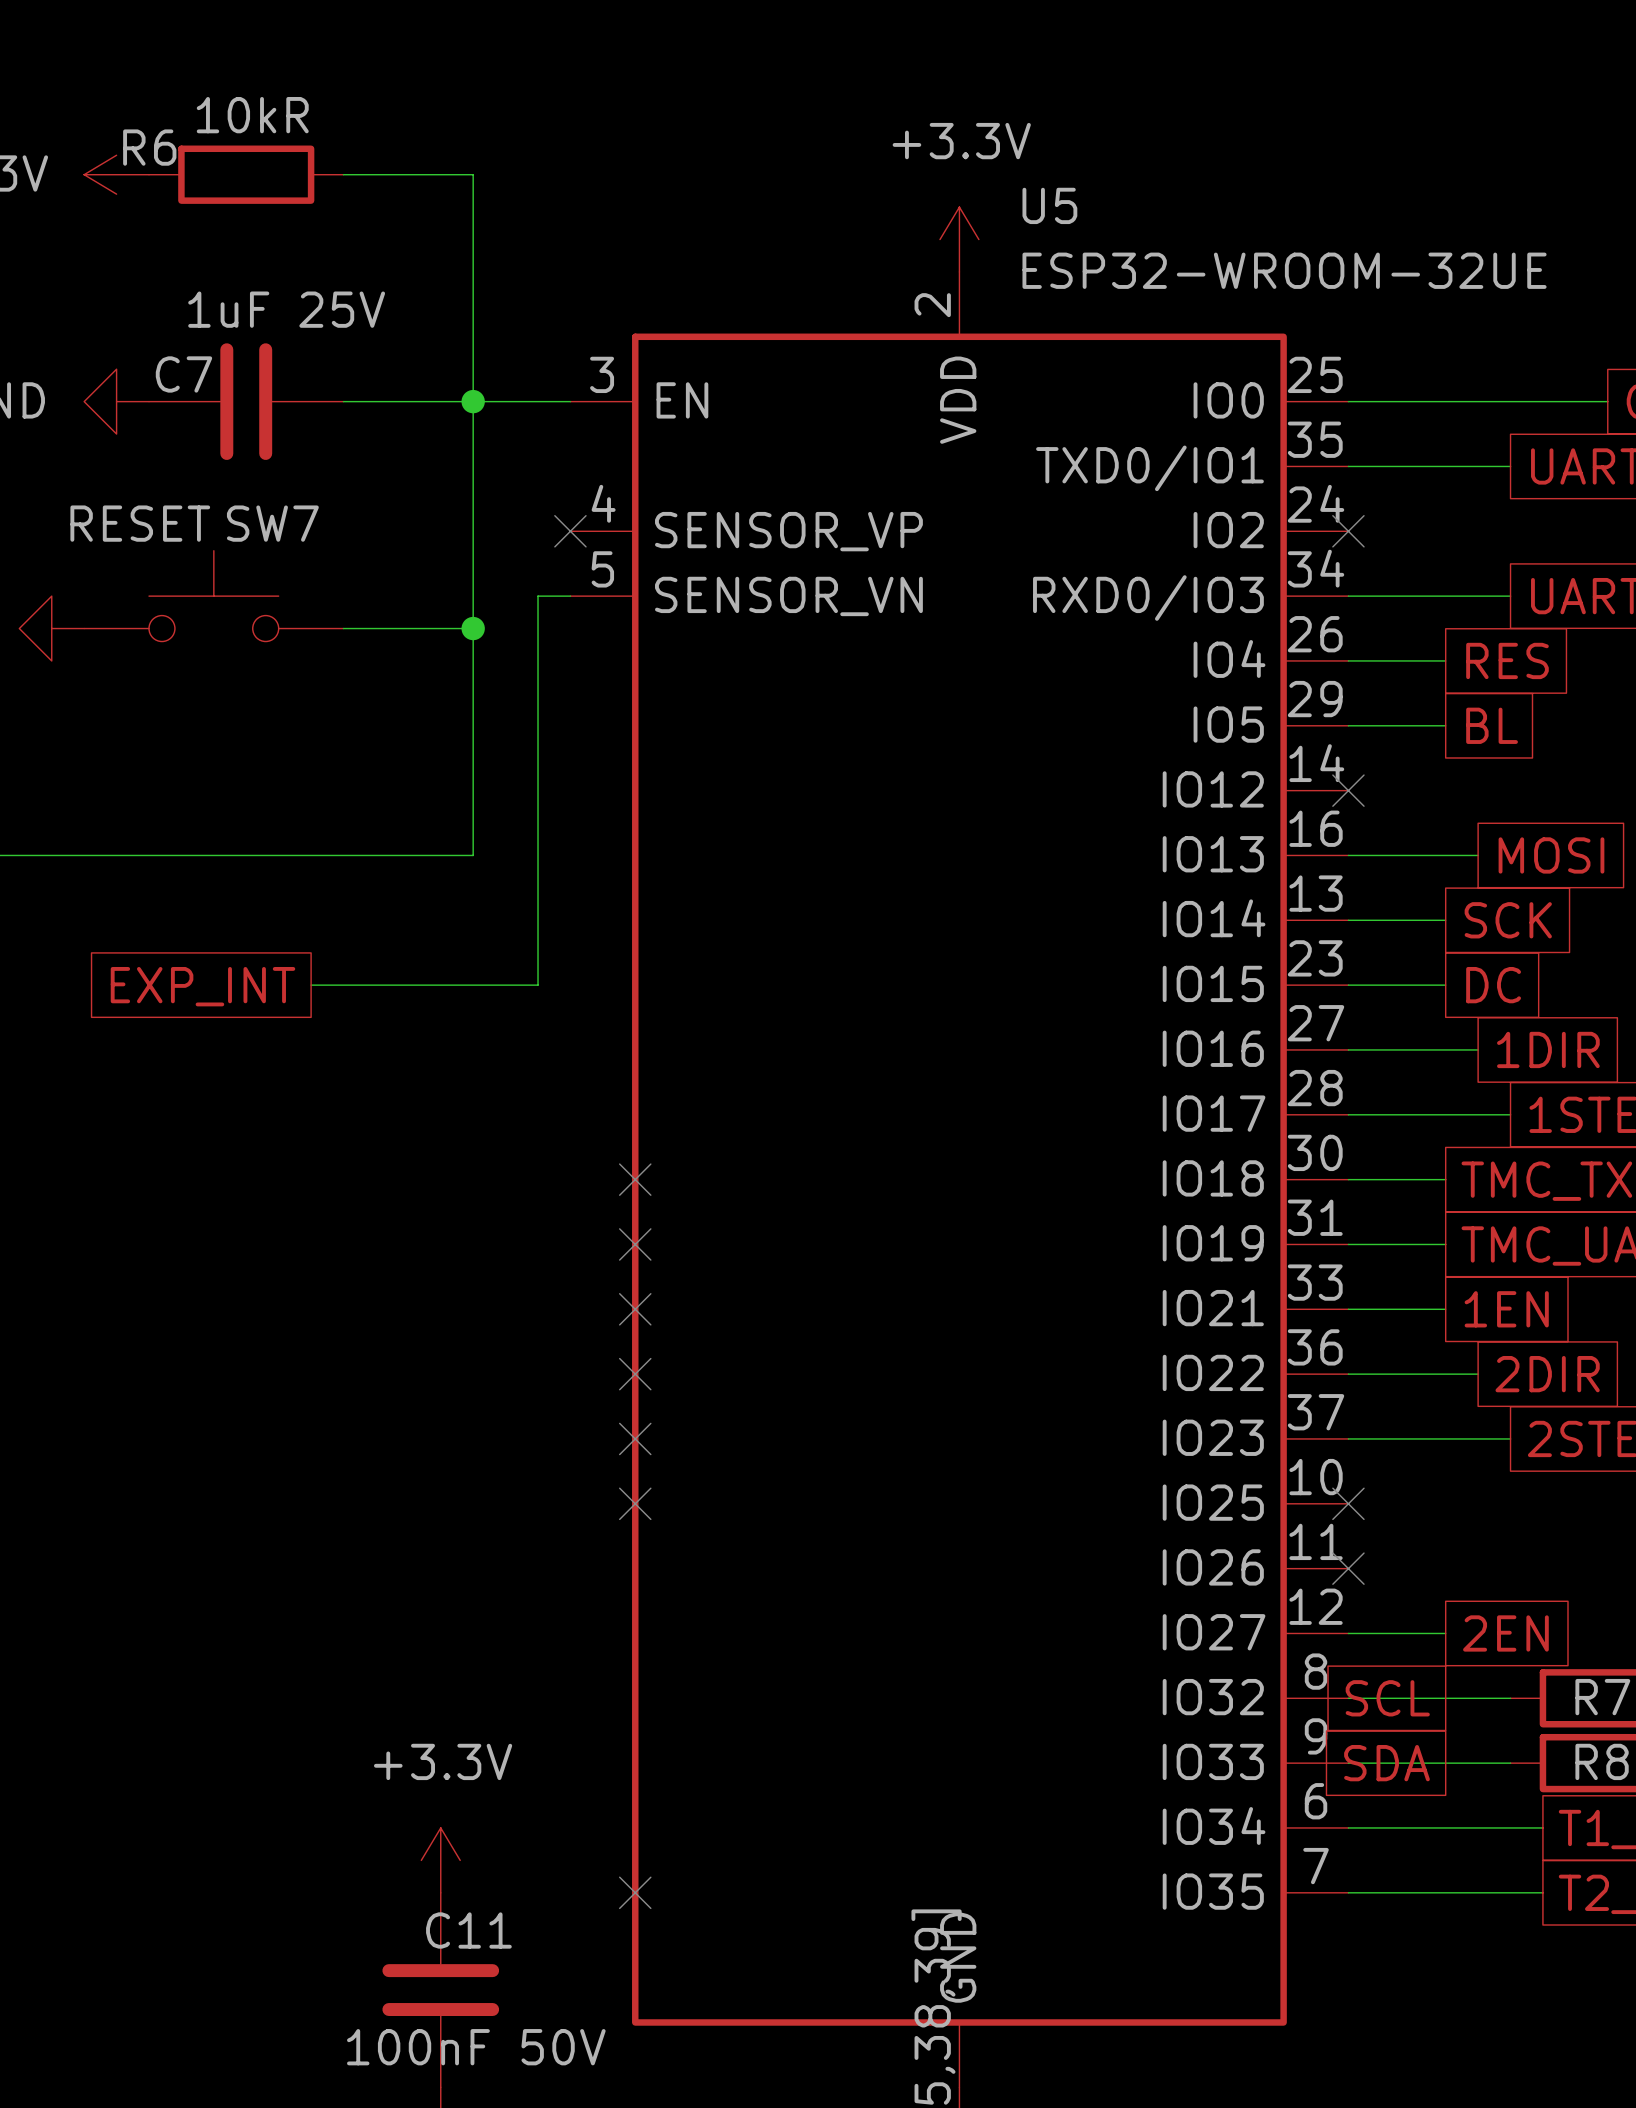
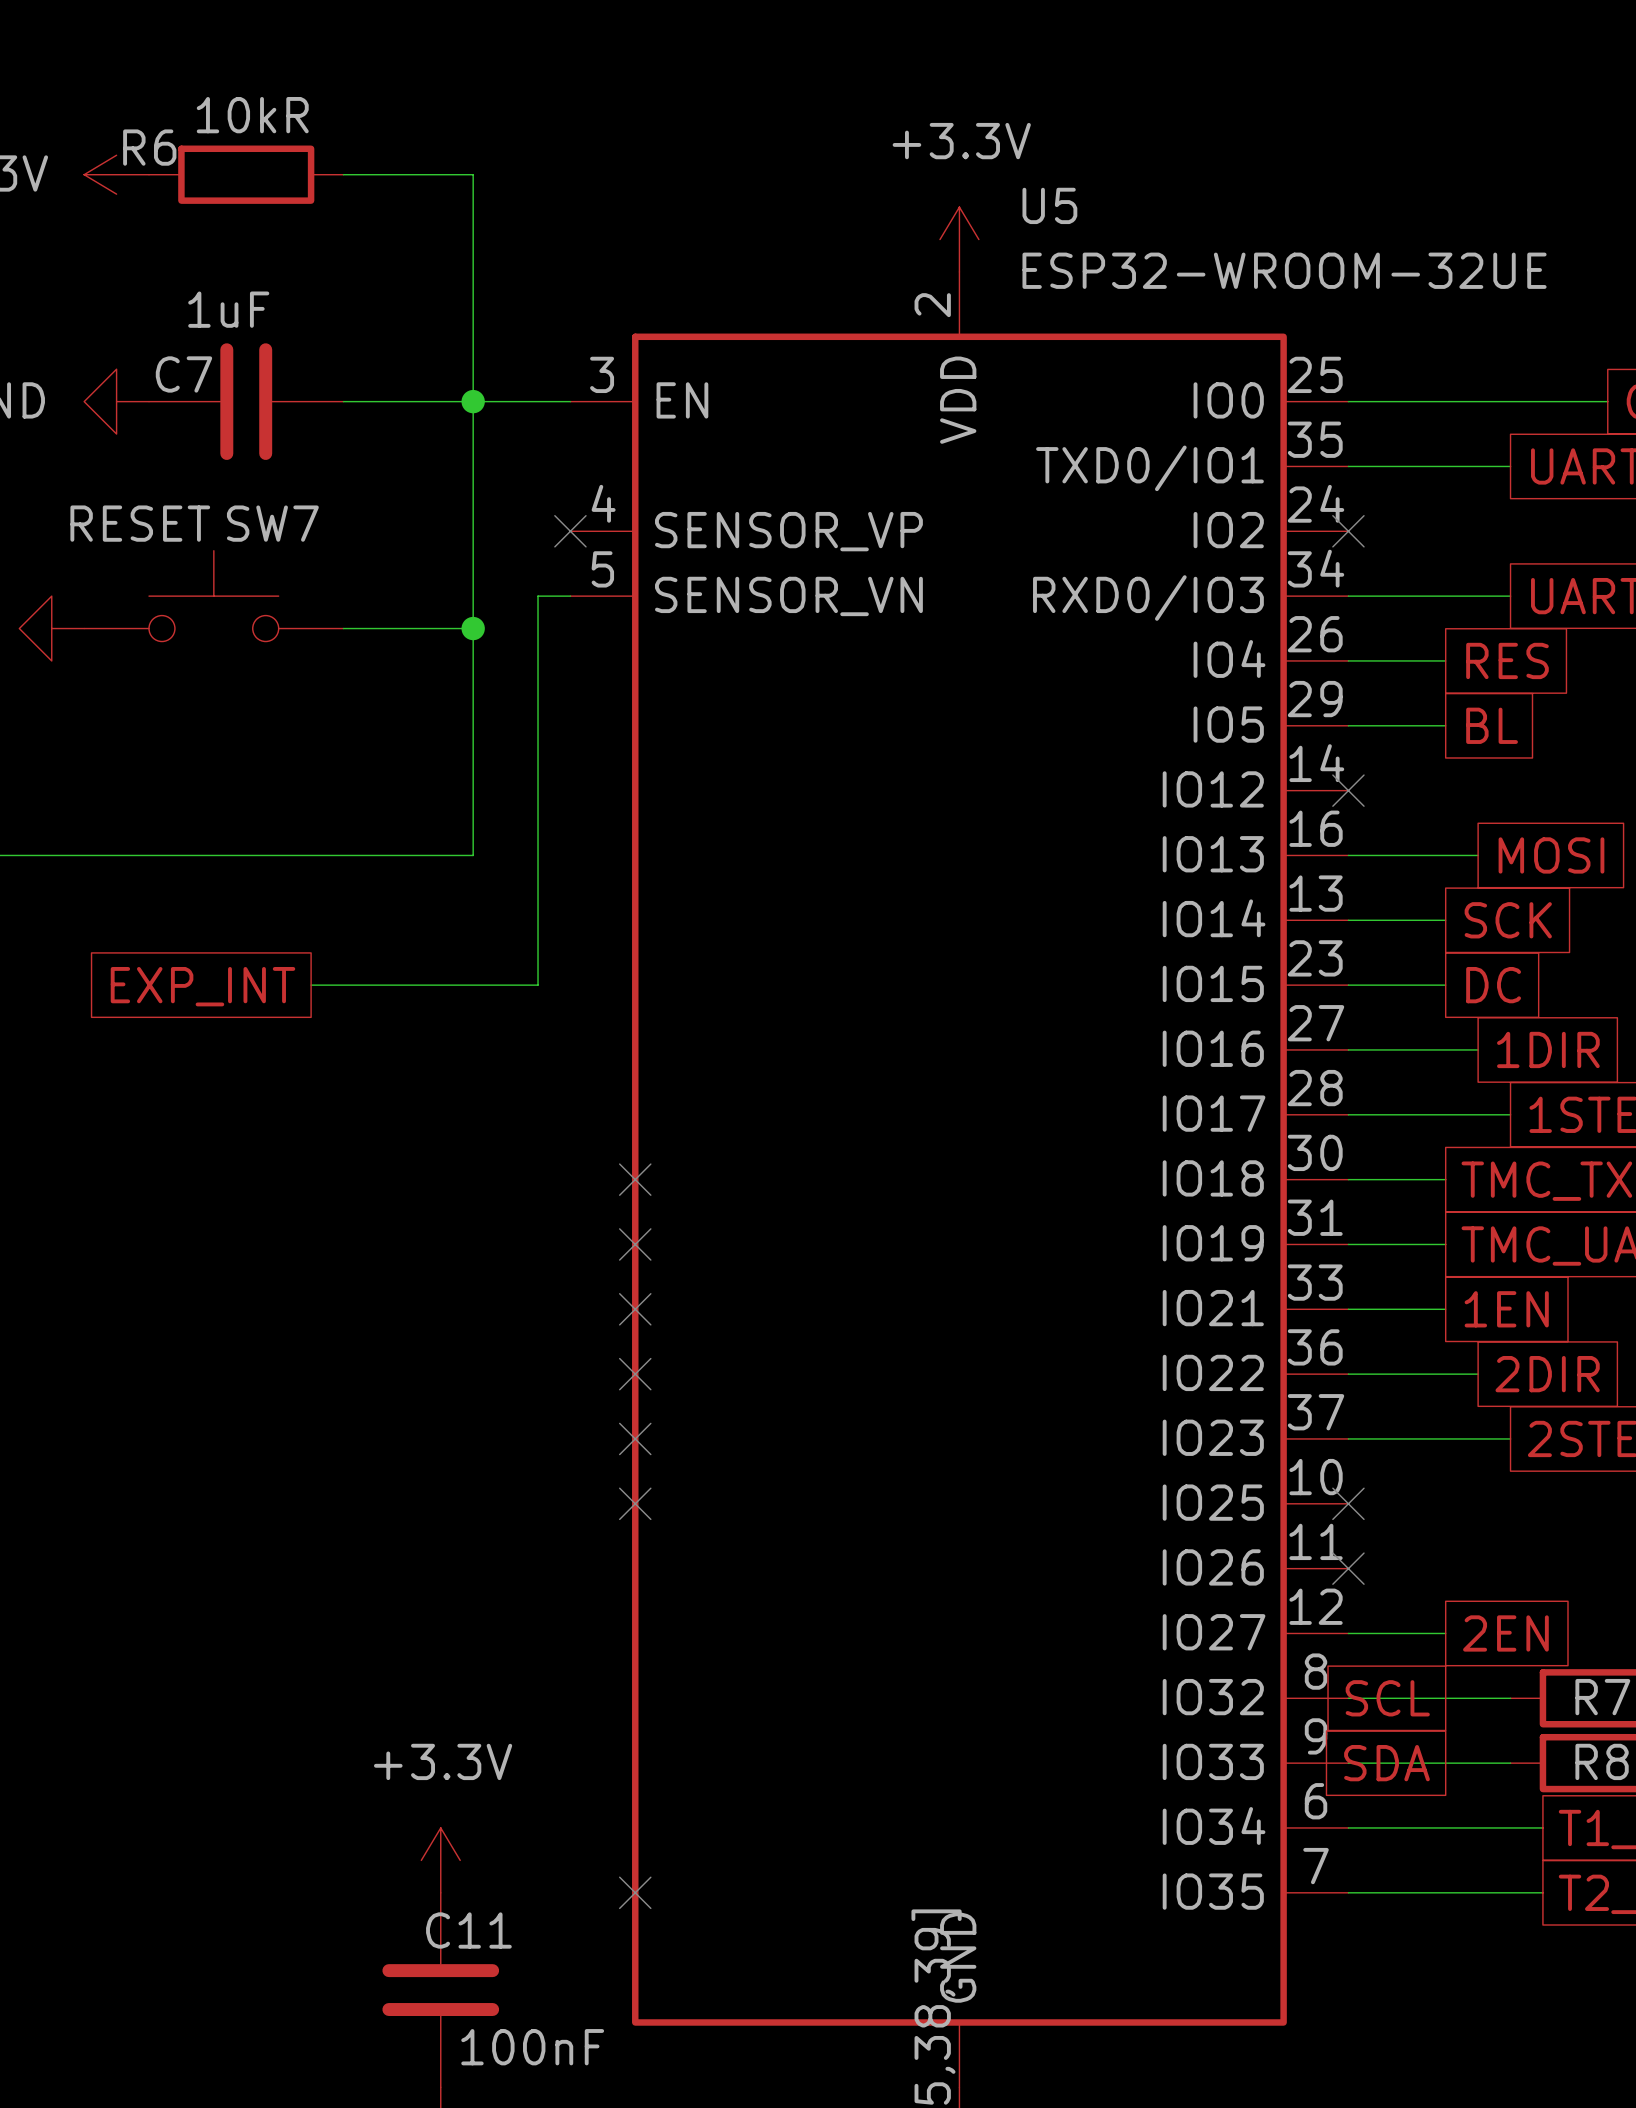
C7 value: 1uF 25V (286, 309) -> 1uF (228, 309)
C11 value: 100nF 50V (476, 2047) -> 100nF (532, 2047)

